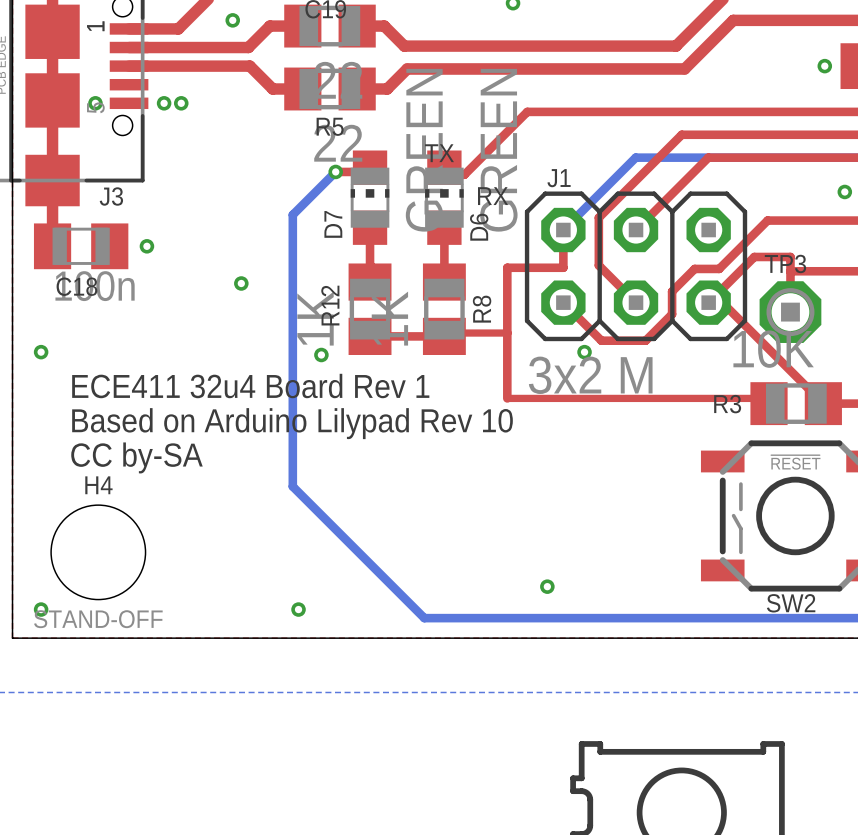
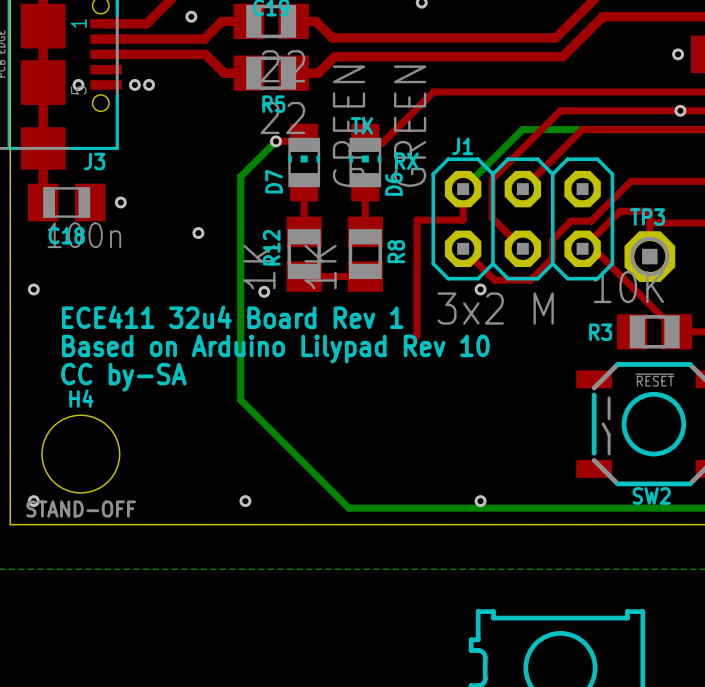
via position: (844, 191) -> (680, 110)
top track: (507, 333) (448, 333) (444, 336) -> none
top track: (507, 398) (768, 398) (769, 403) -> (417, 327) (417, 336)
via position: (547, 586) -> (480, 501)

